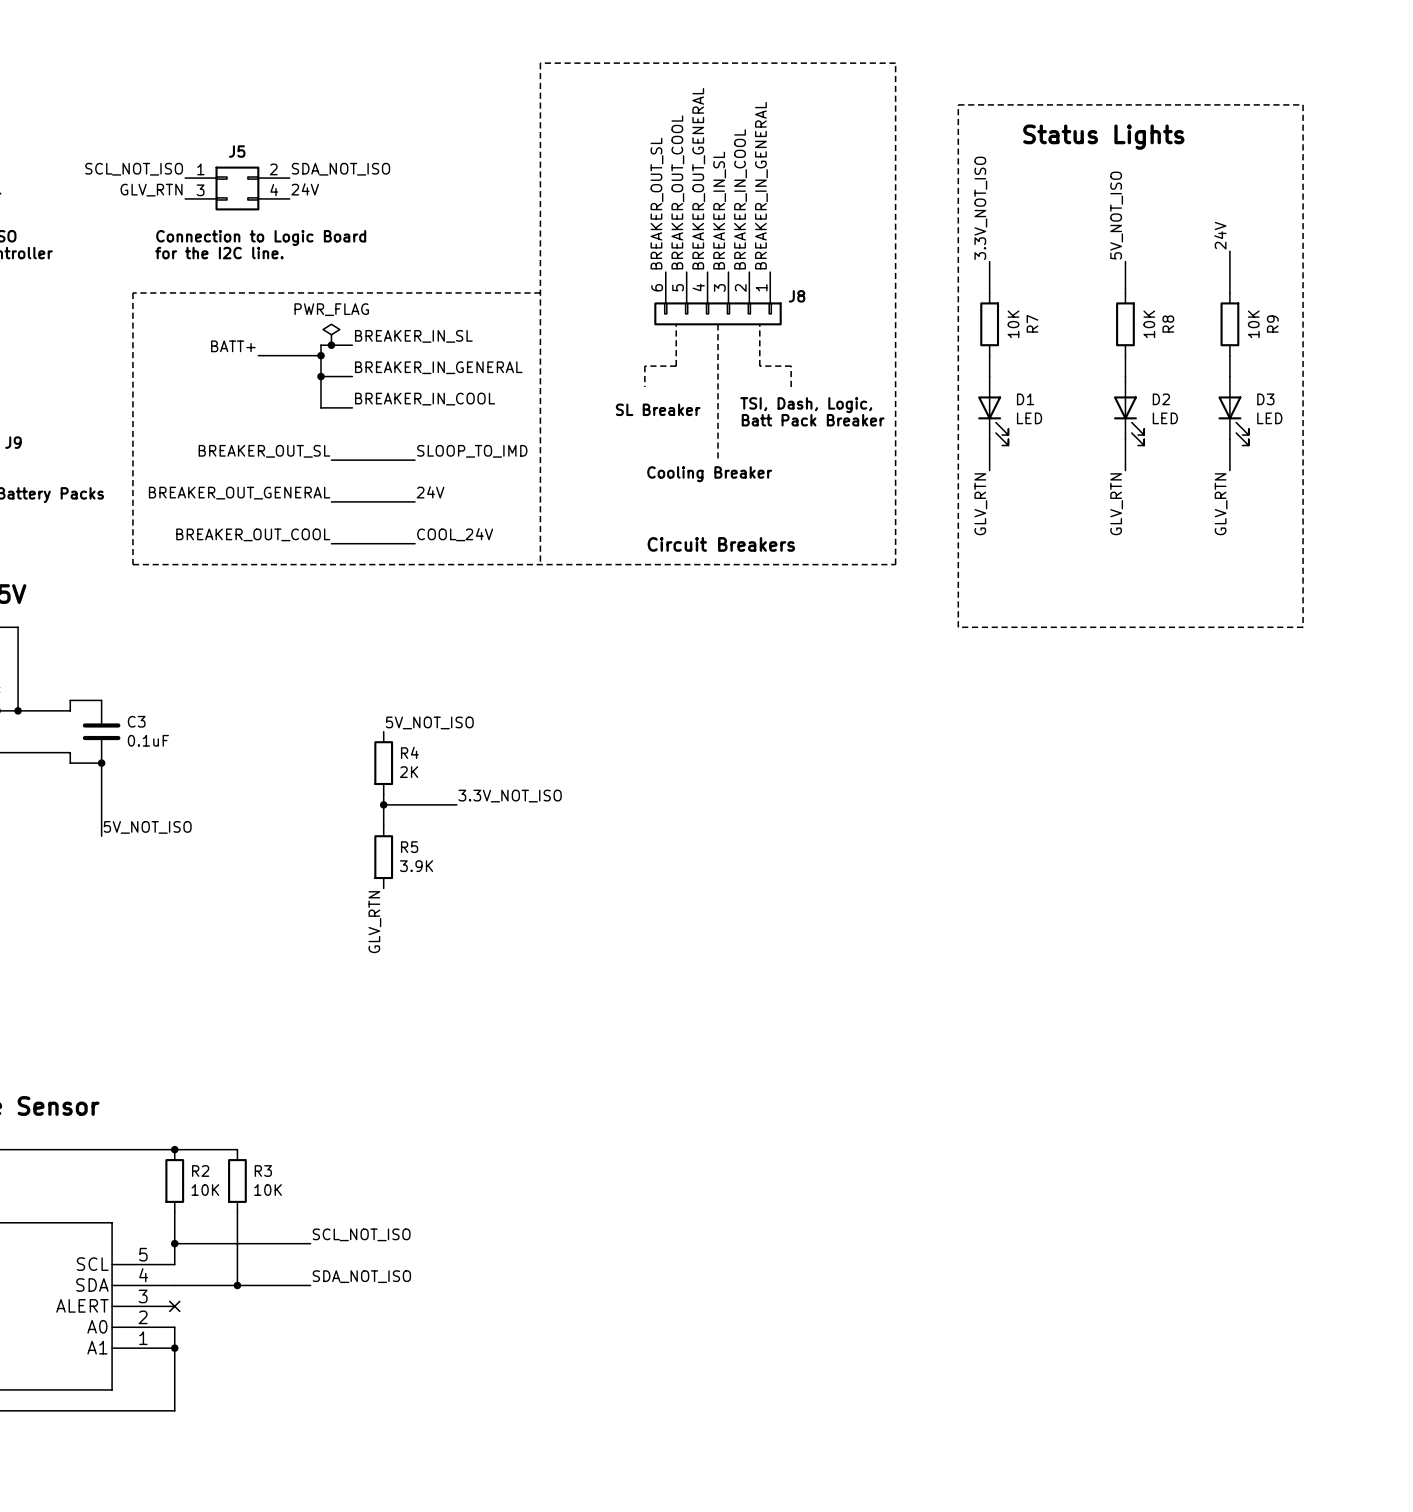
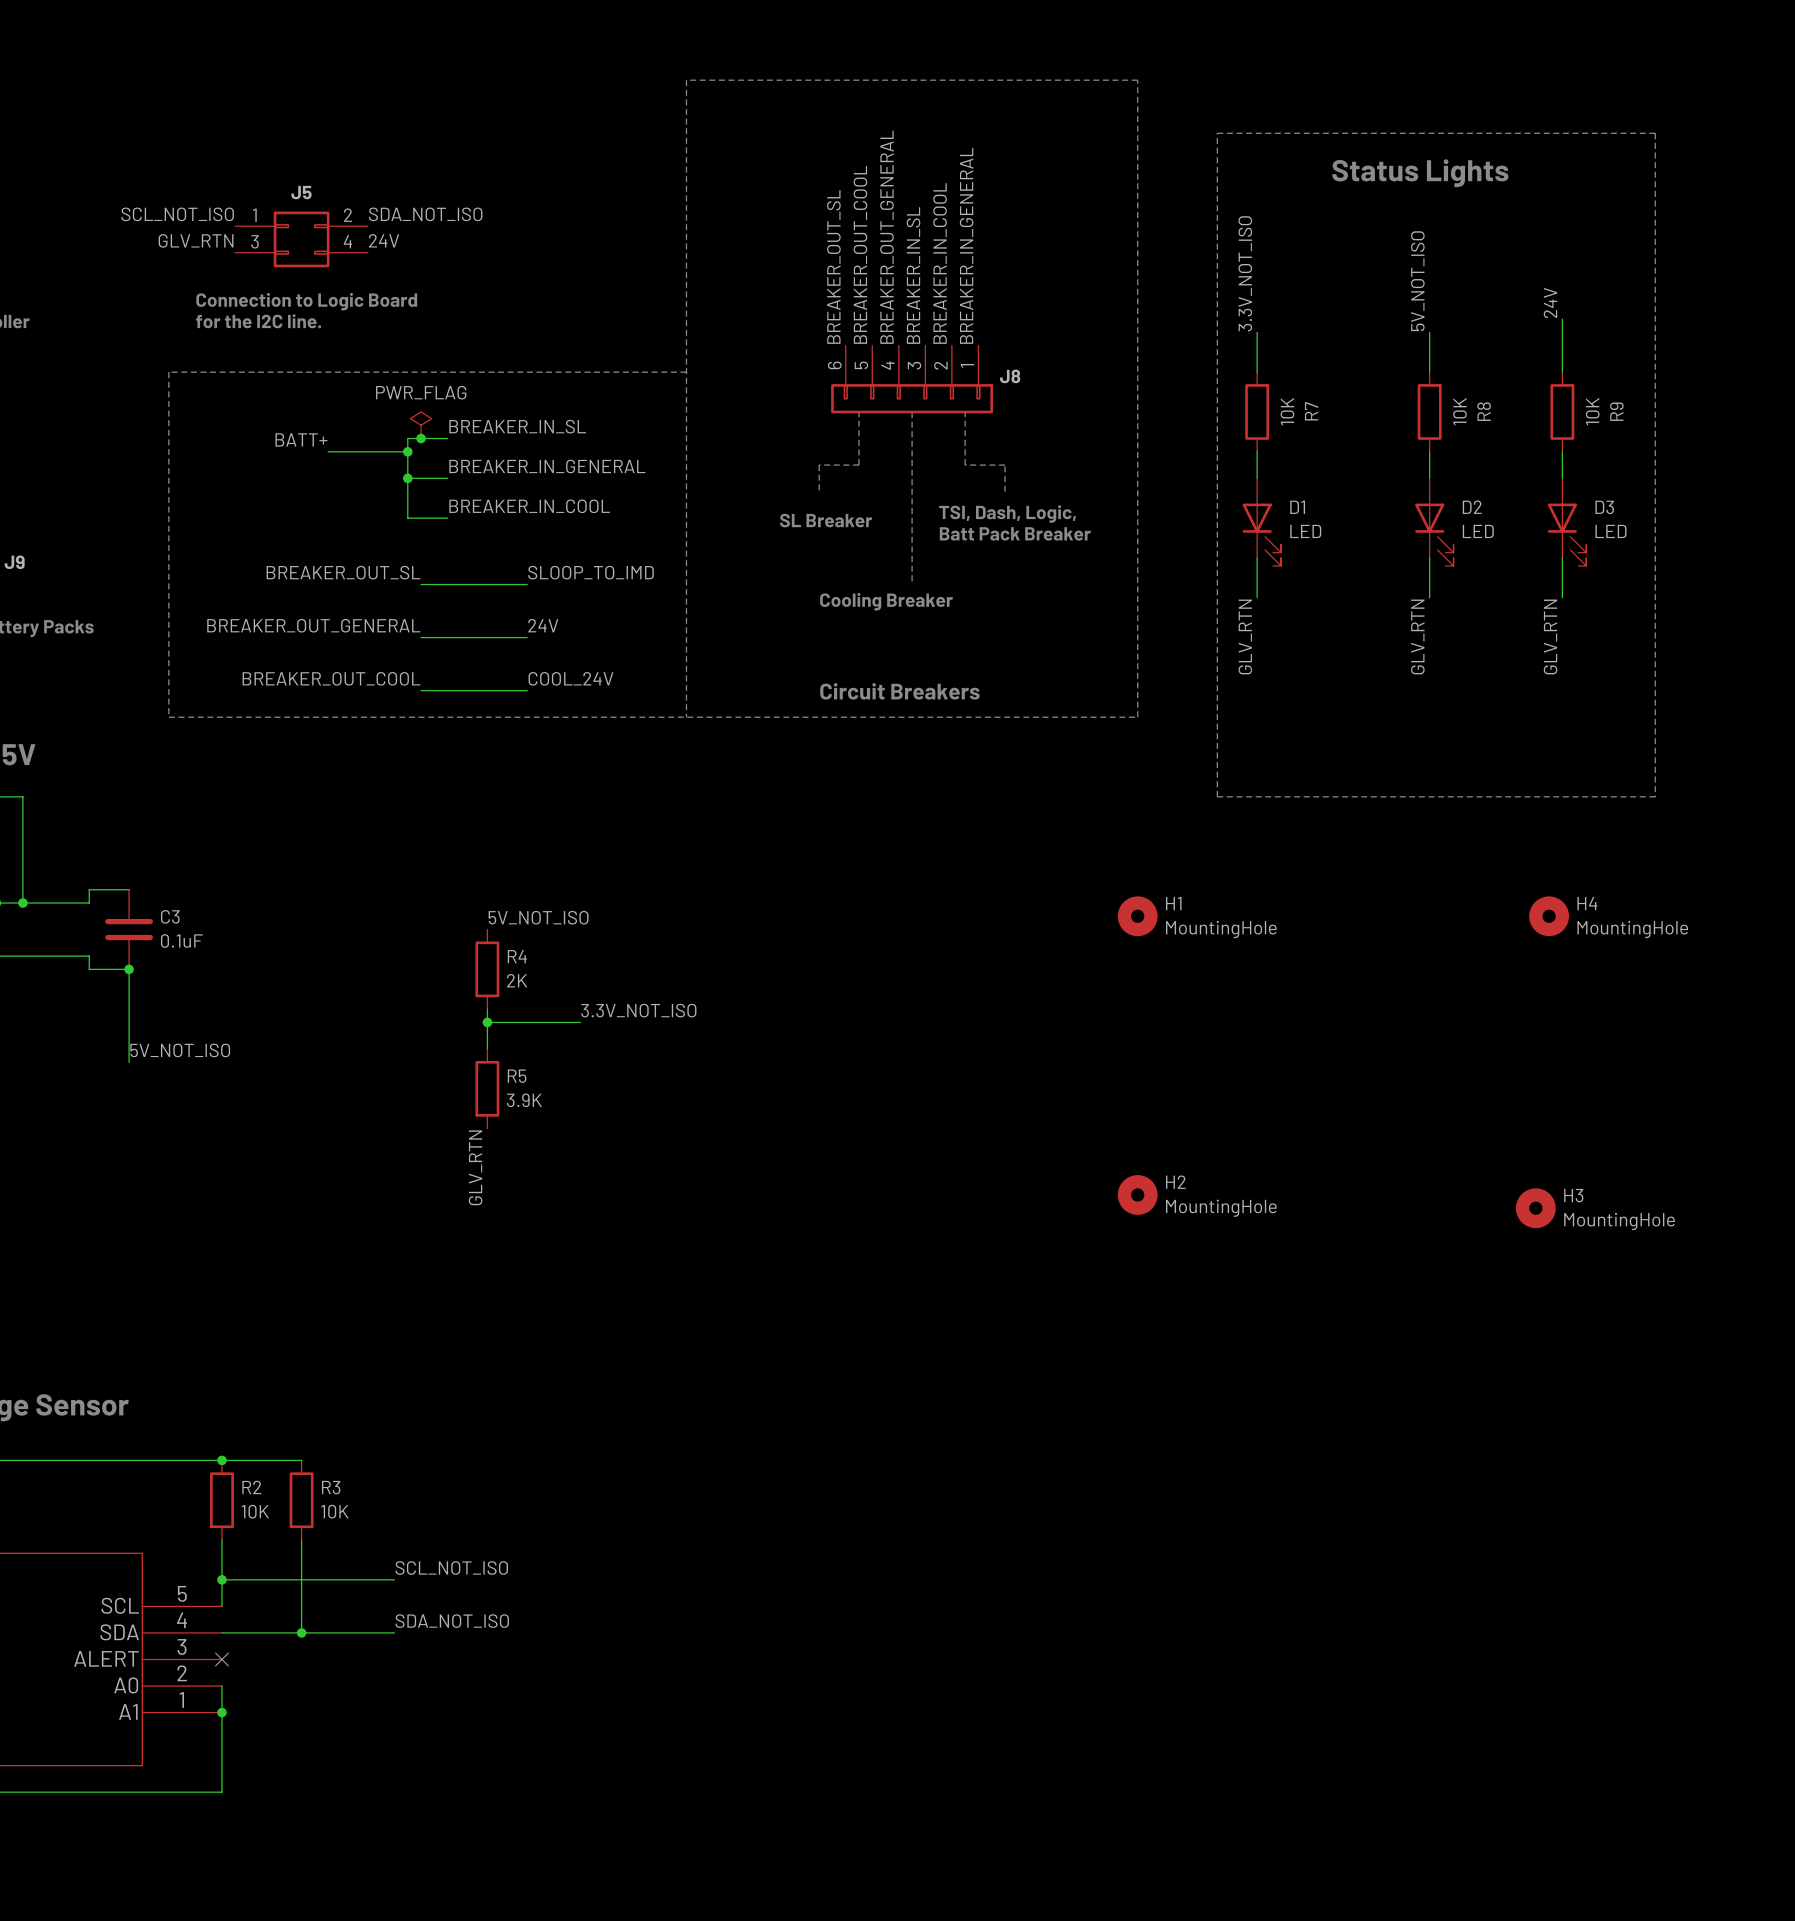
H1: none -> MountingHole (1137, 916)
H4: none -> MountingHole (1549, 916)
H2: none -> MountingHole (1137, 1194)
H3: none -> MountingHole (1535, 1208)

